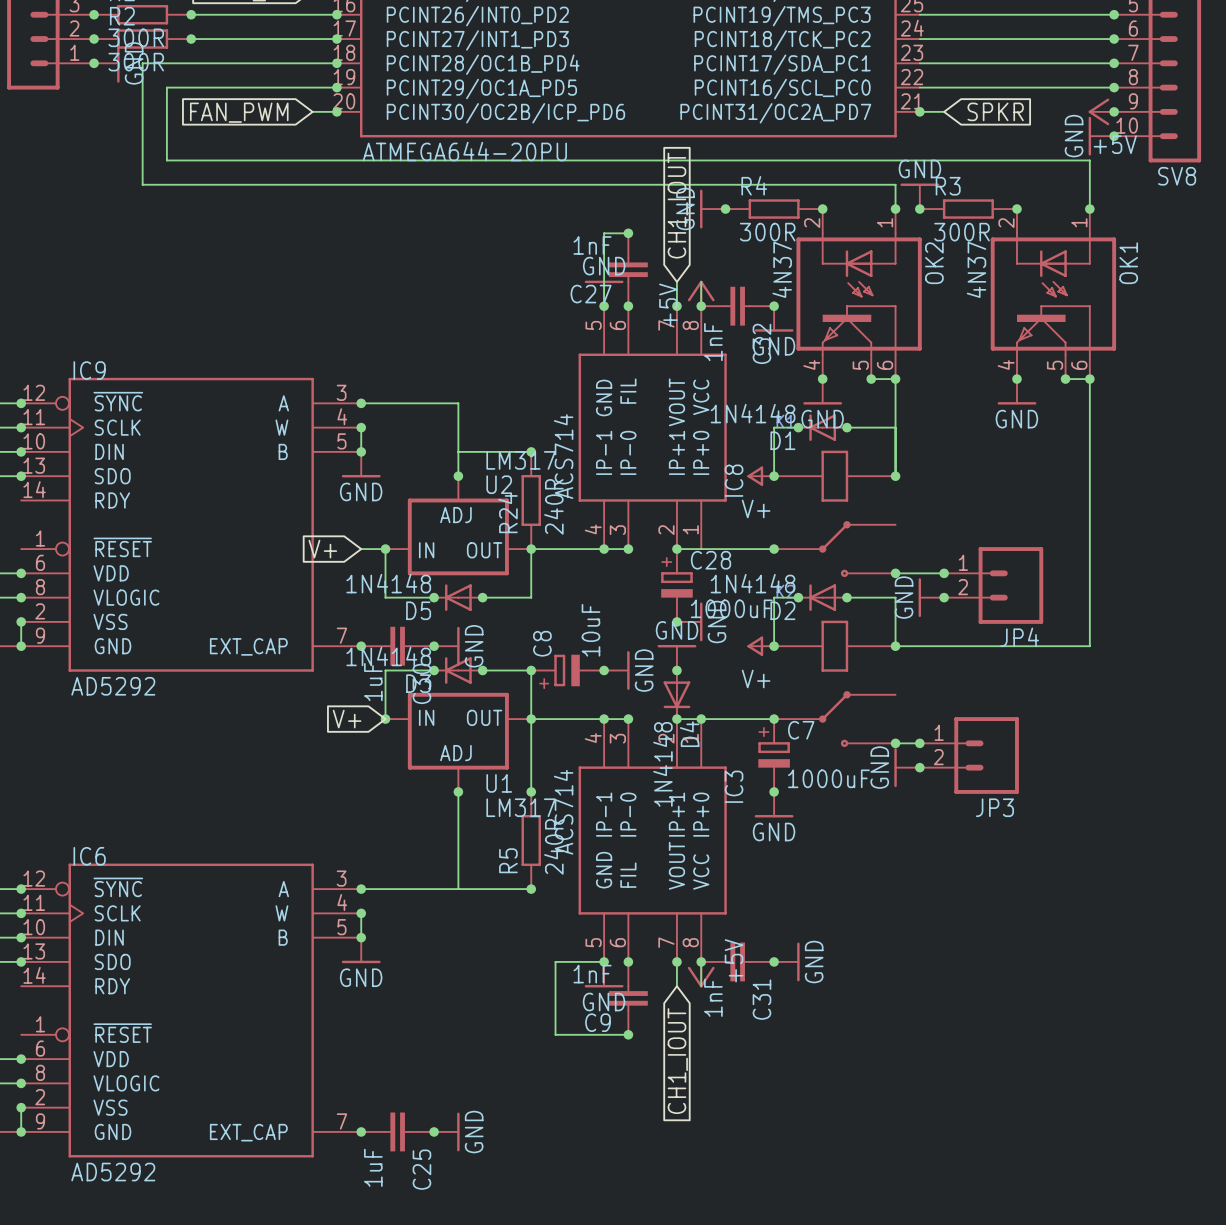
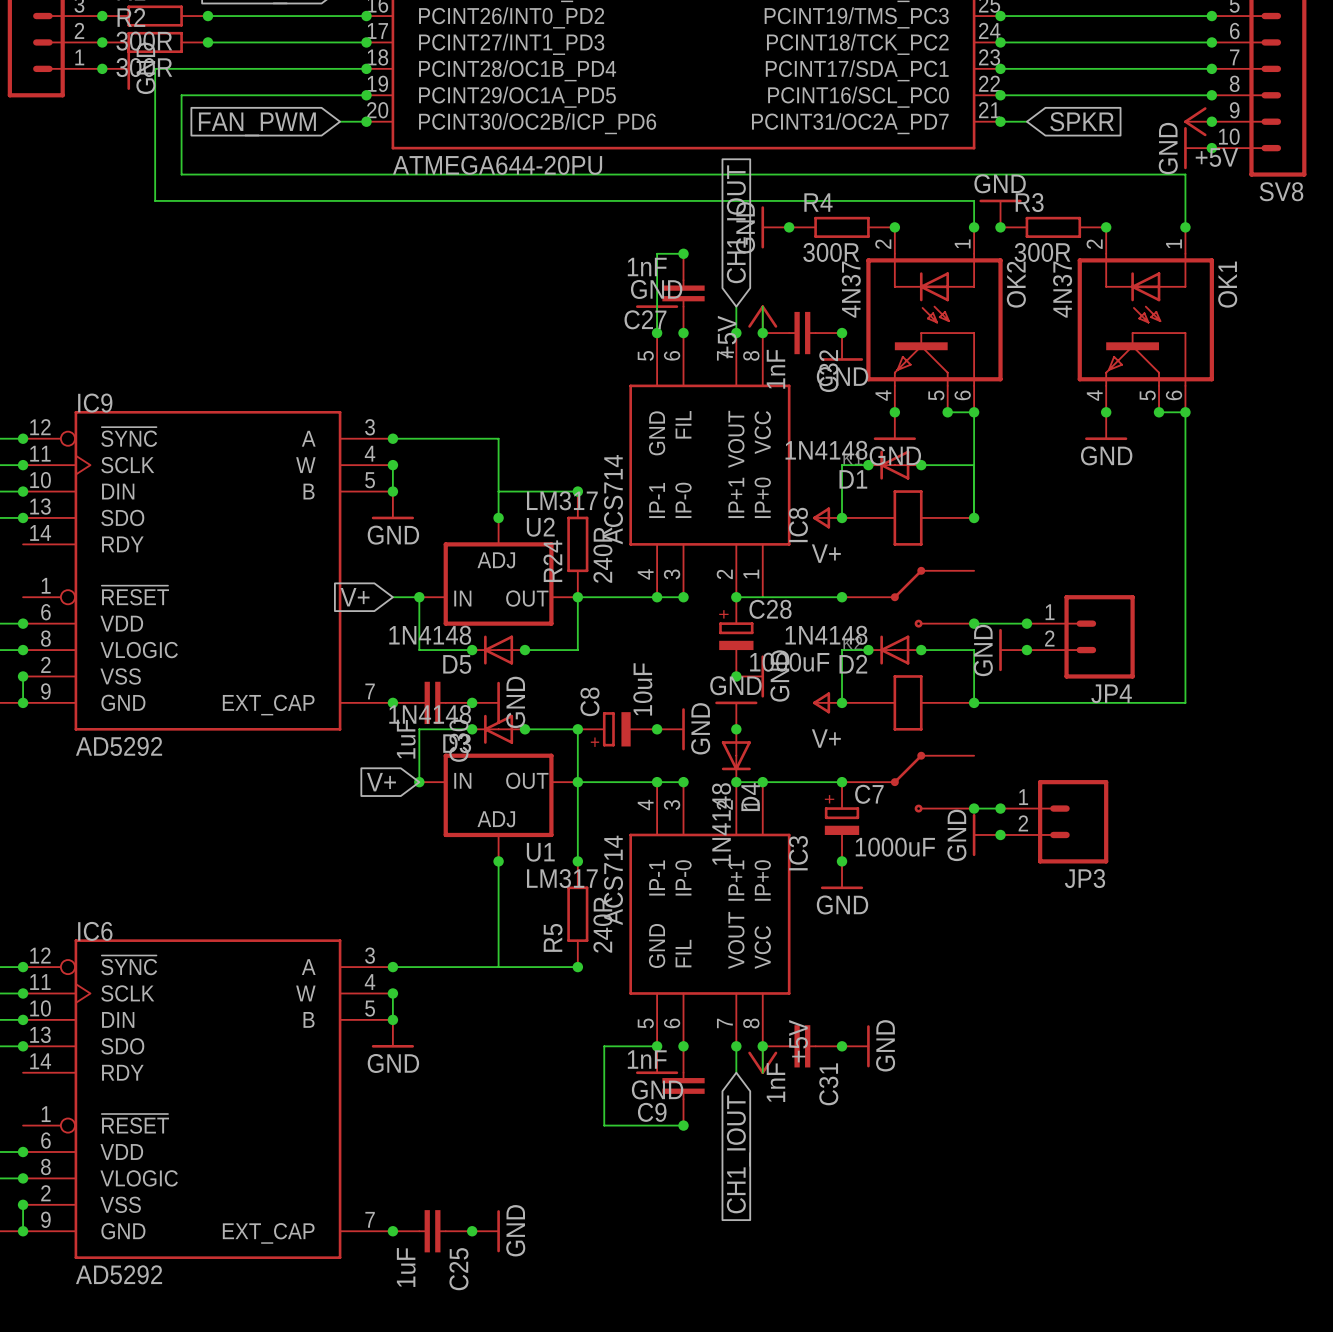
junction: none -> (1000, 16)
junction: none -> (1000, 42)
junction: none -> (1000, 68)
junction: none -> (1000, 95)

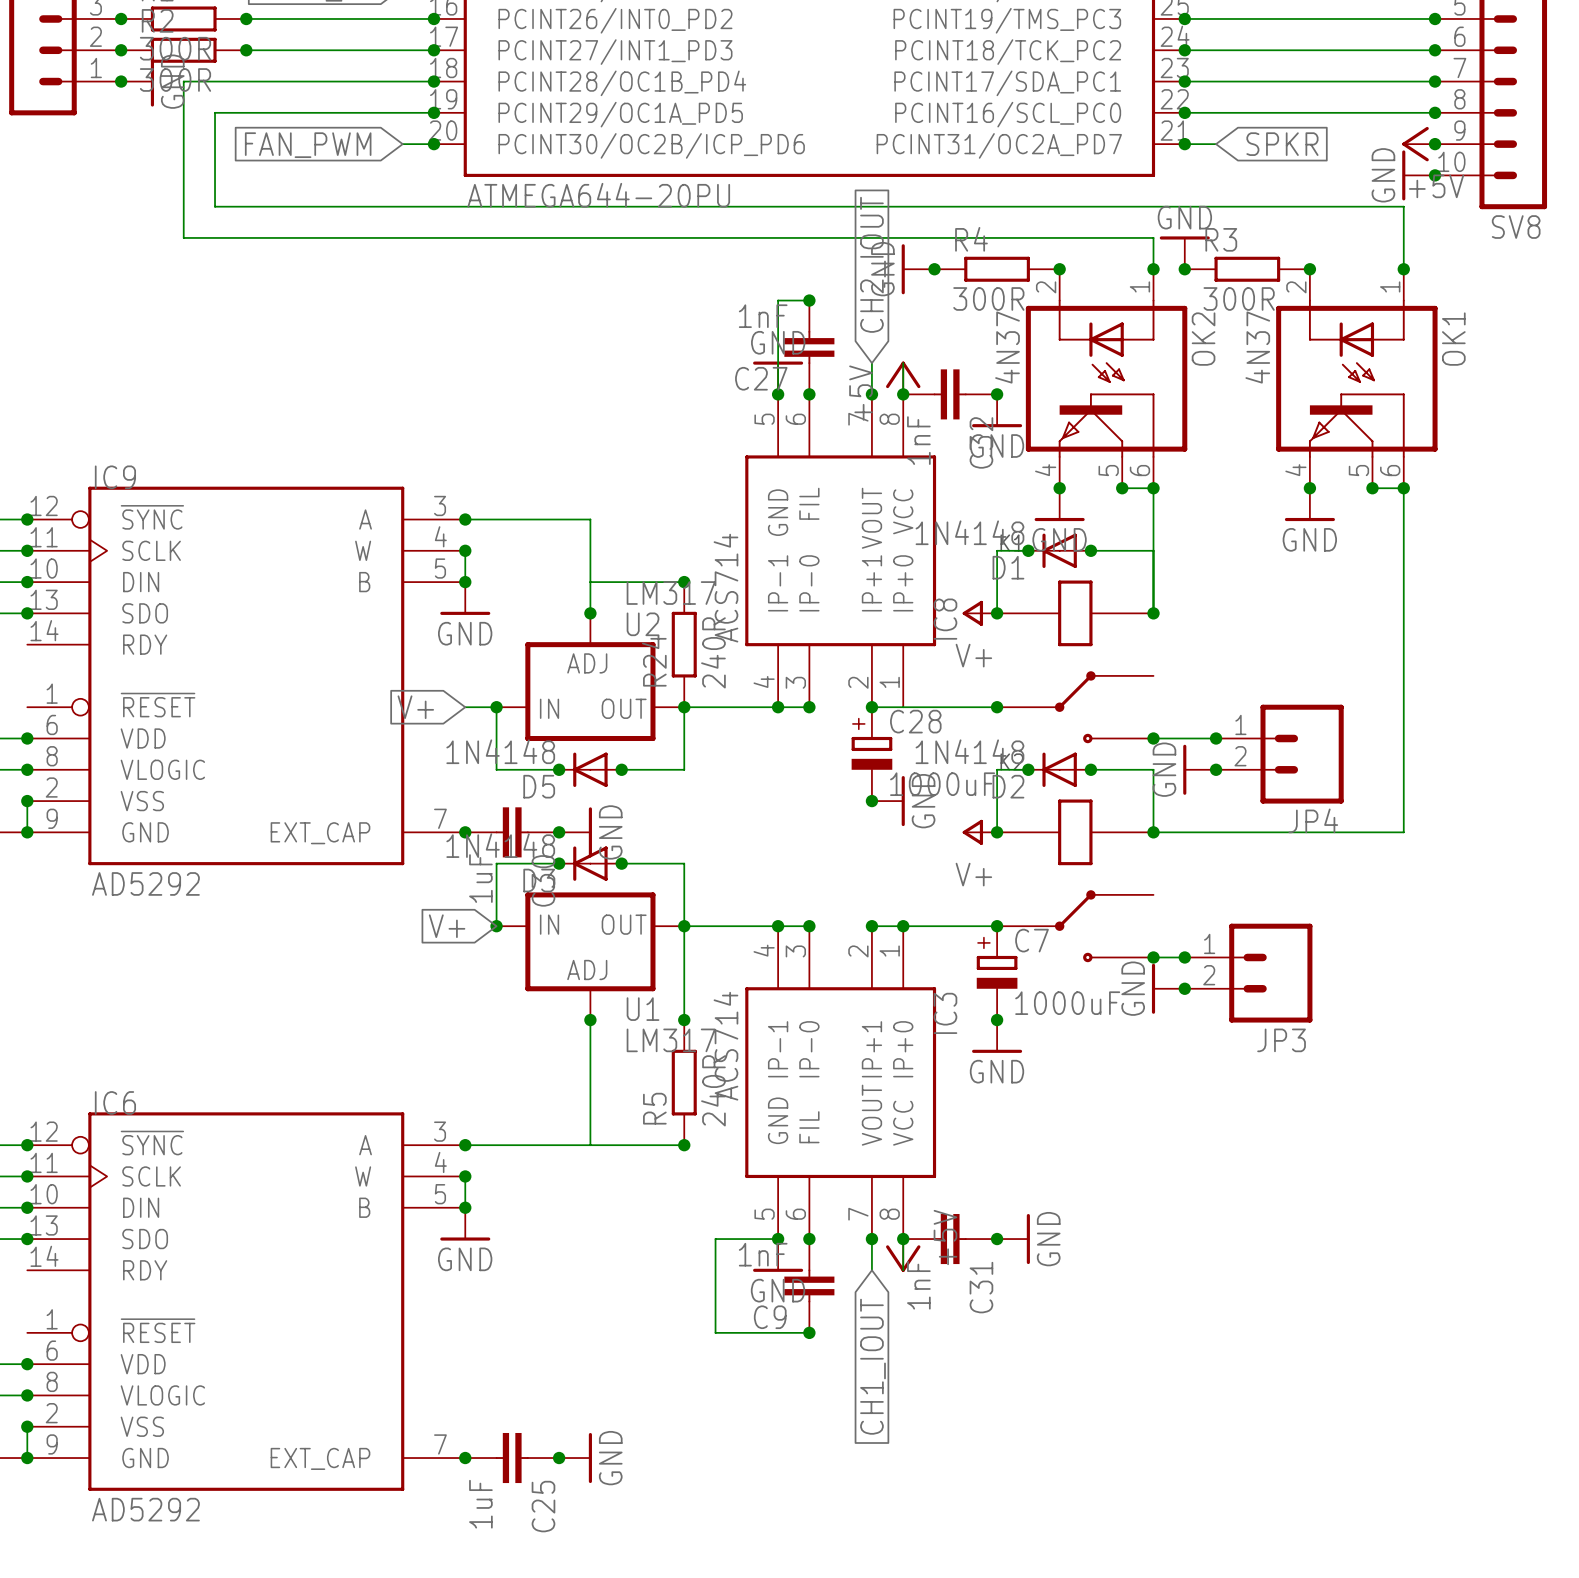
global label: CH1_IOUT (738, 224) -> CH2_IOUT (873, 264)
power symbol: GND (736, 715) -> none
junction: (577, 729) -> none
C8: 10uF (617, 729) -> none
junction: (657, 729) -> none
power symbol: GND (670, 729) -> none
junction: (736, 729) -> none
D4: 1N4148 (736, 755) -> none

